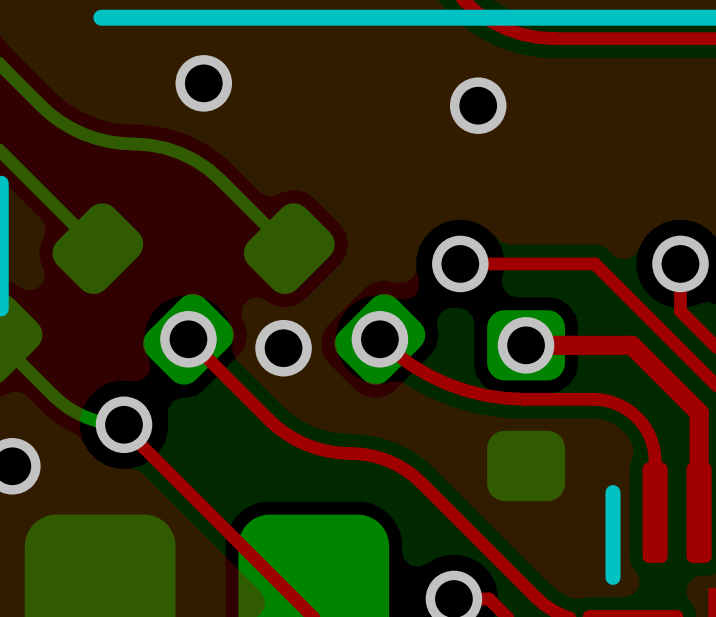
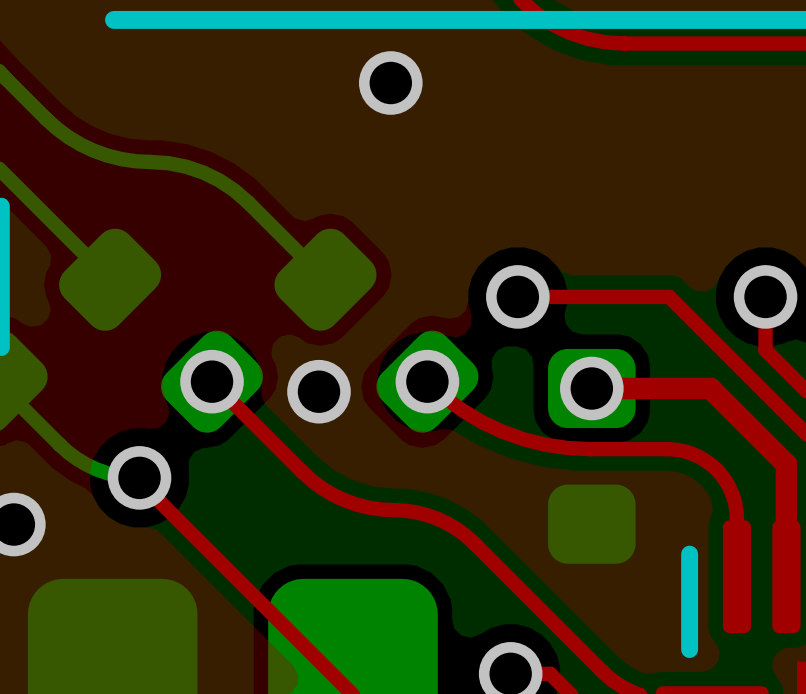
via: none -> (390, 83)
via: (203, 83) -> none
via: (478, 105) -> none

